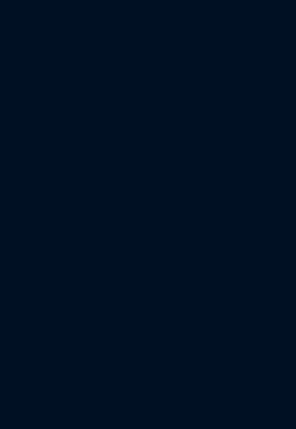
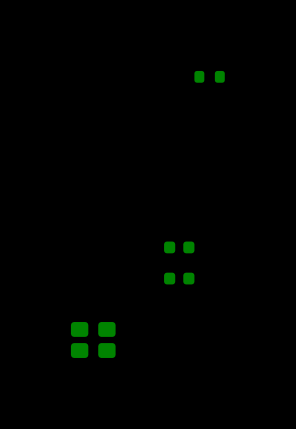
part: none -> (209, 76)
part: none -> (179, 247)
part: none -> (179, 278)
part: none -> (93, 339)

